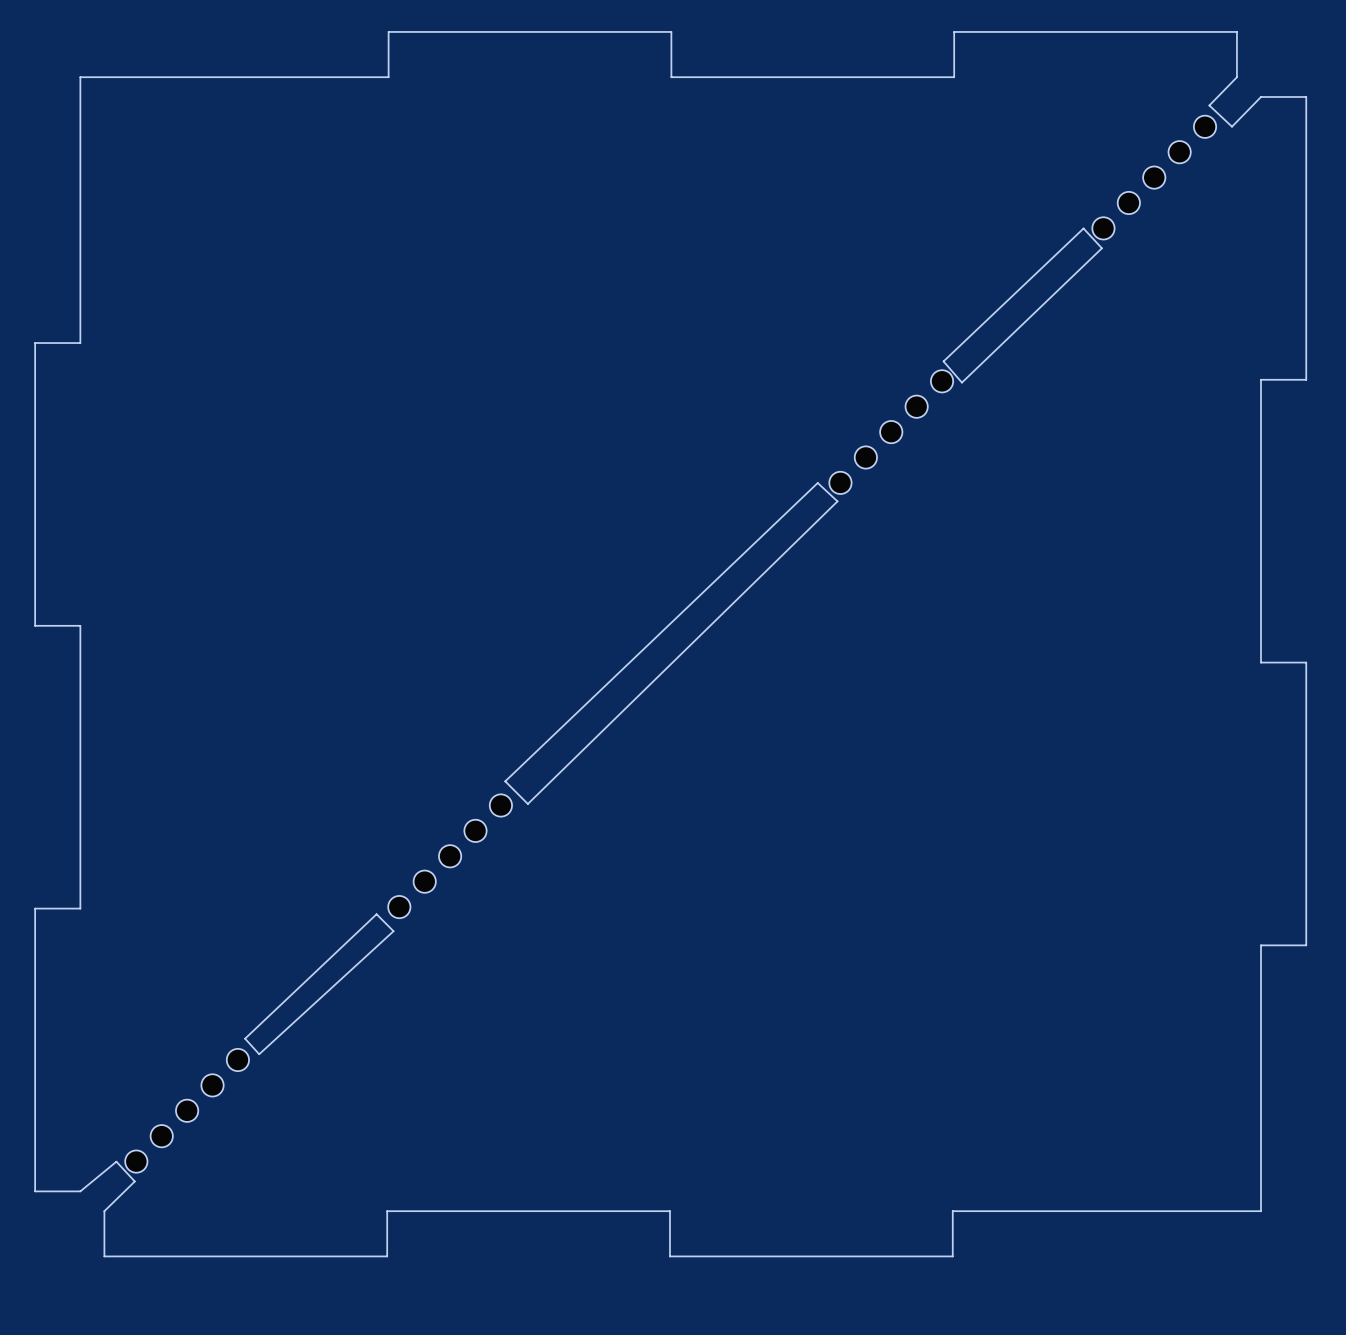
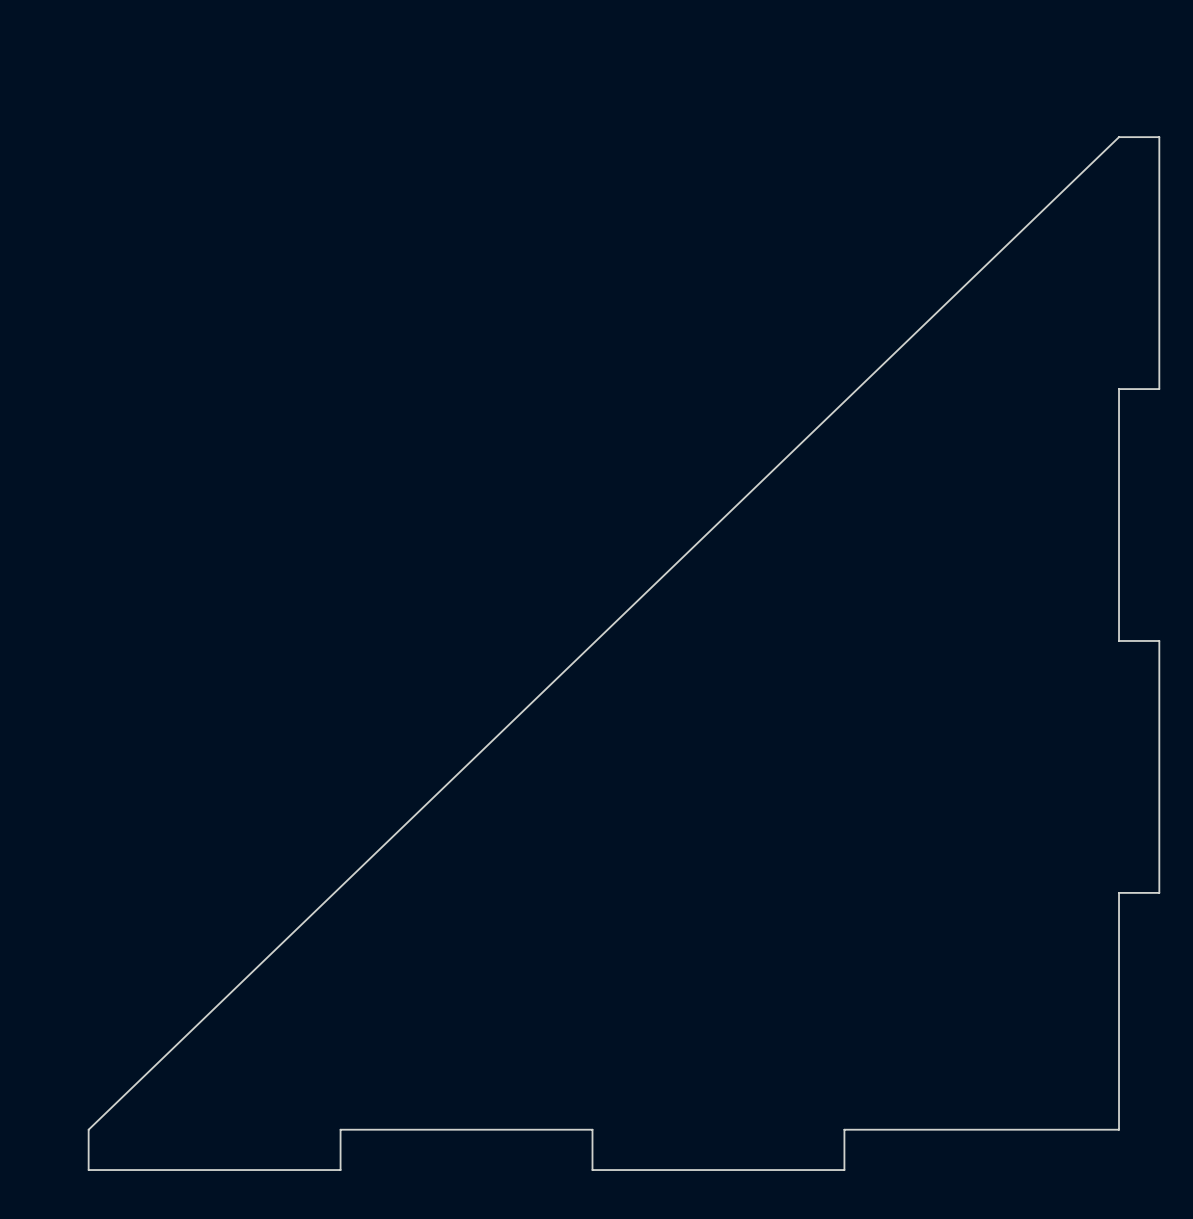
board edge: (1261, 97) (1232, 126) (1209, 105) (1236, 77) (1236, 31) (954, 31) (954, 77) (671, 77) (671, 31) (388, 31) (388, 77) (80, 77) (80, 343) (35, 343) (35, 625) (80, 625) (80, 908) (35, 908) (35, 1191) (80, 1191) (116, 1161) (134, 1181) (104, 1211) -> (1119, 137) (88, 1129)
part: (1154, 177) -> none
board edge: (1083, 228) (943, 361) (961, 382) (1101, 248) (1083, 228) -> none
part: (891, 432) -> none
board edge: (817, 483) (837, 501) (527, 803) (505, 781) (817, 483) -> none
part: (450, 856) -> none
board edge: (376, 914) (245, 1038) (259, 1054) (393, 931) (376, 914) -> none
part: (187, 1110) -> none

